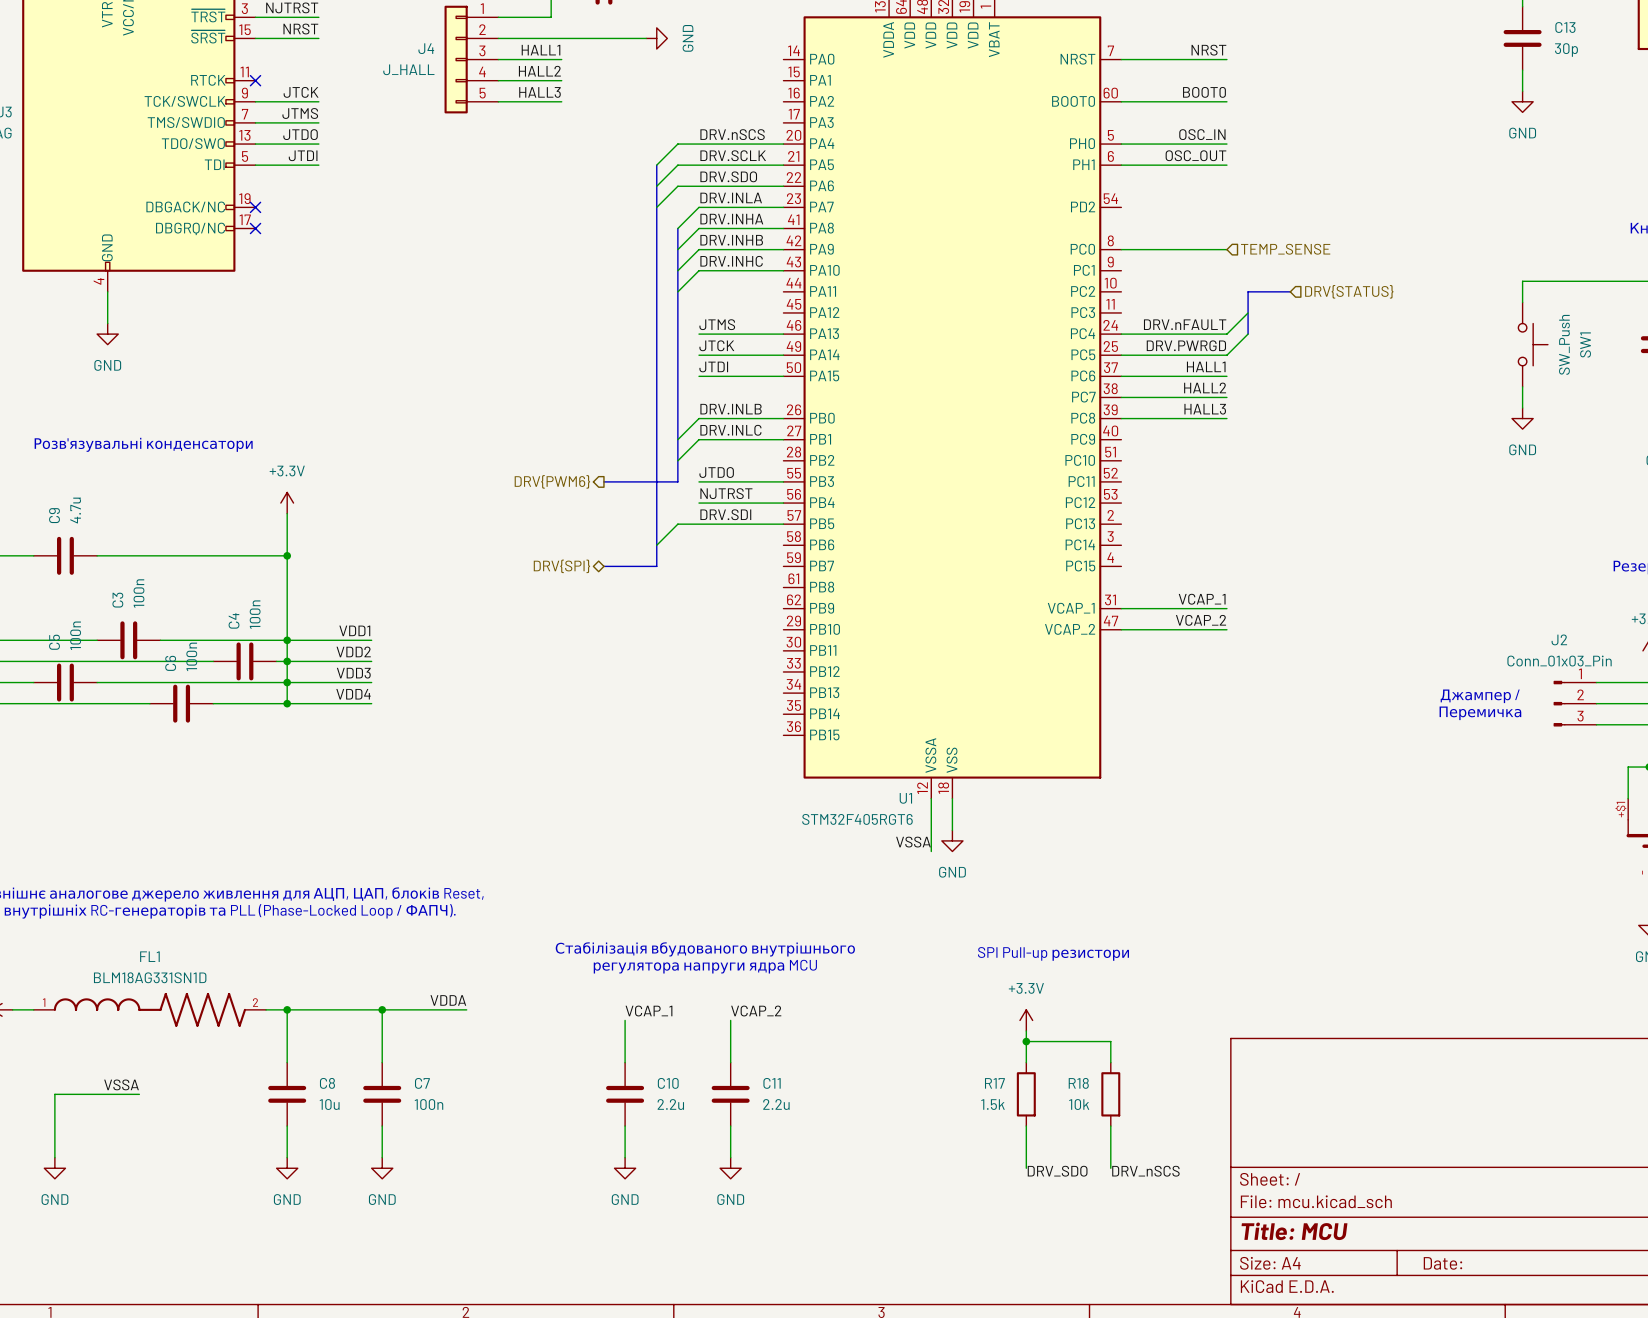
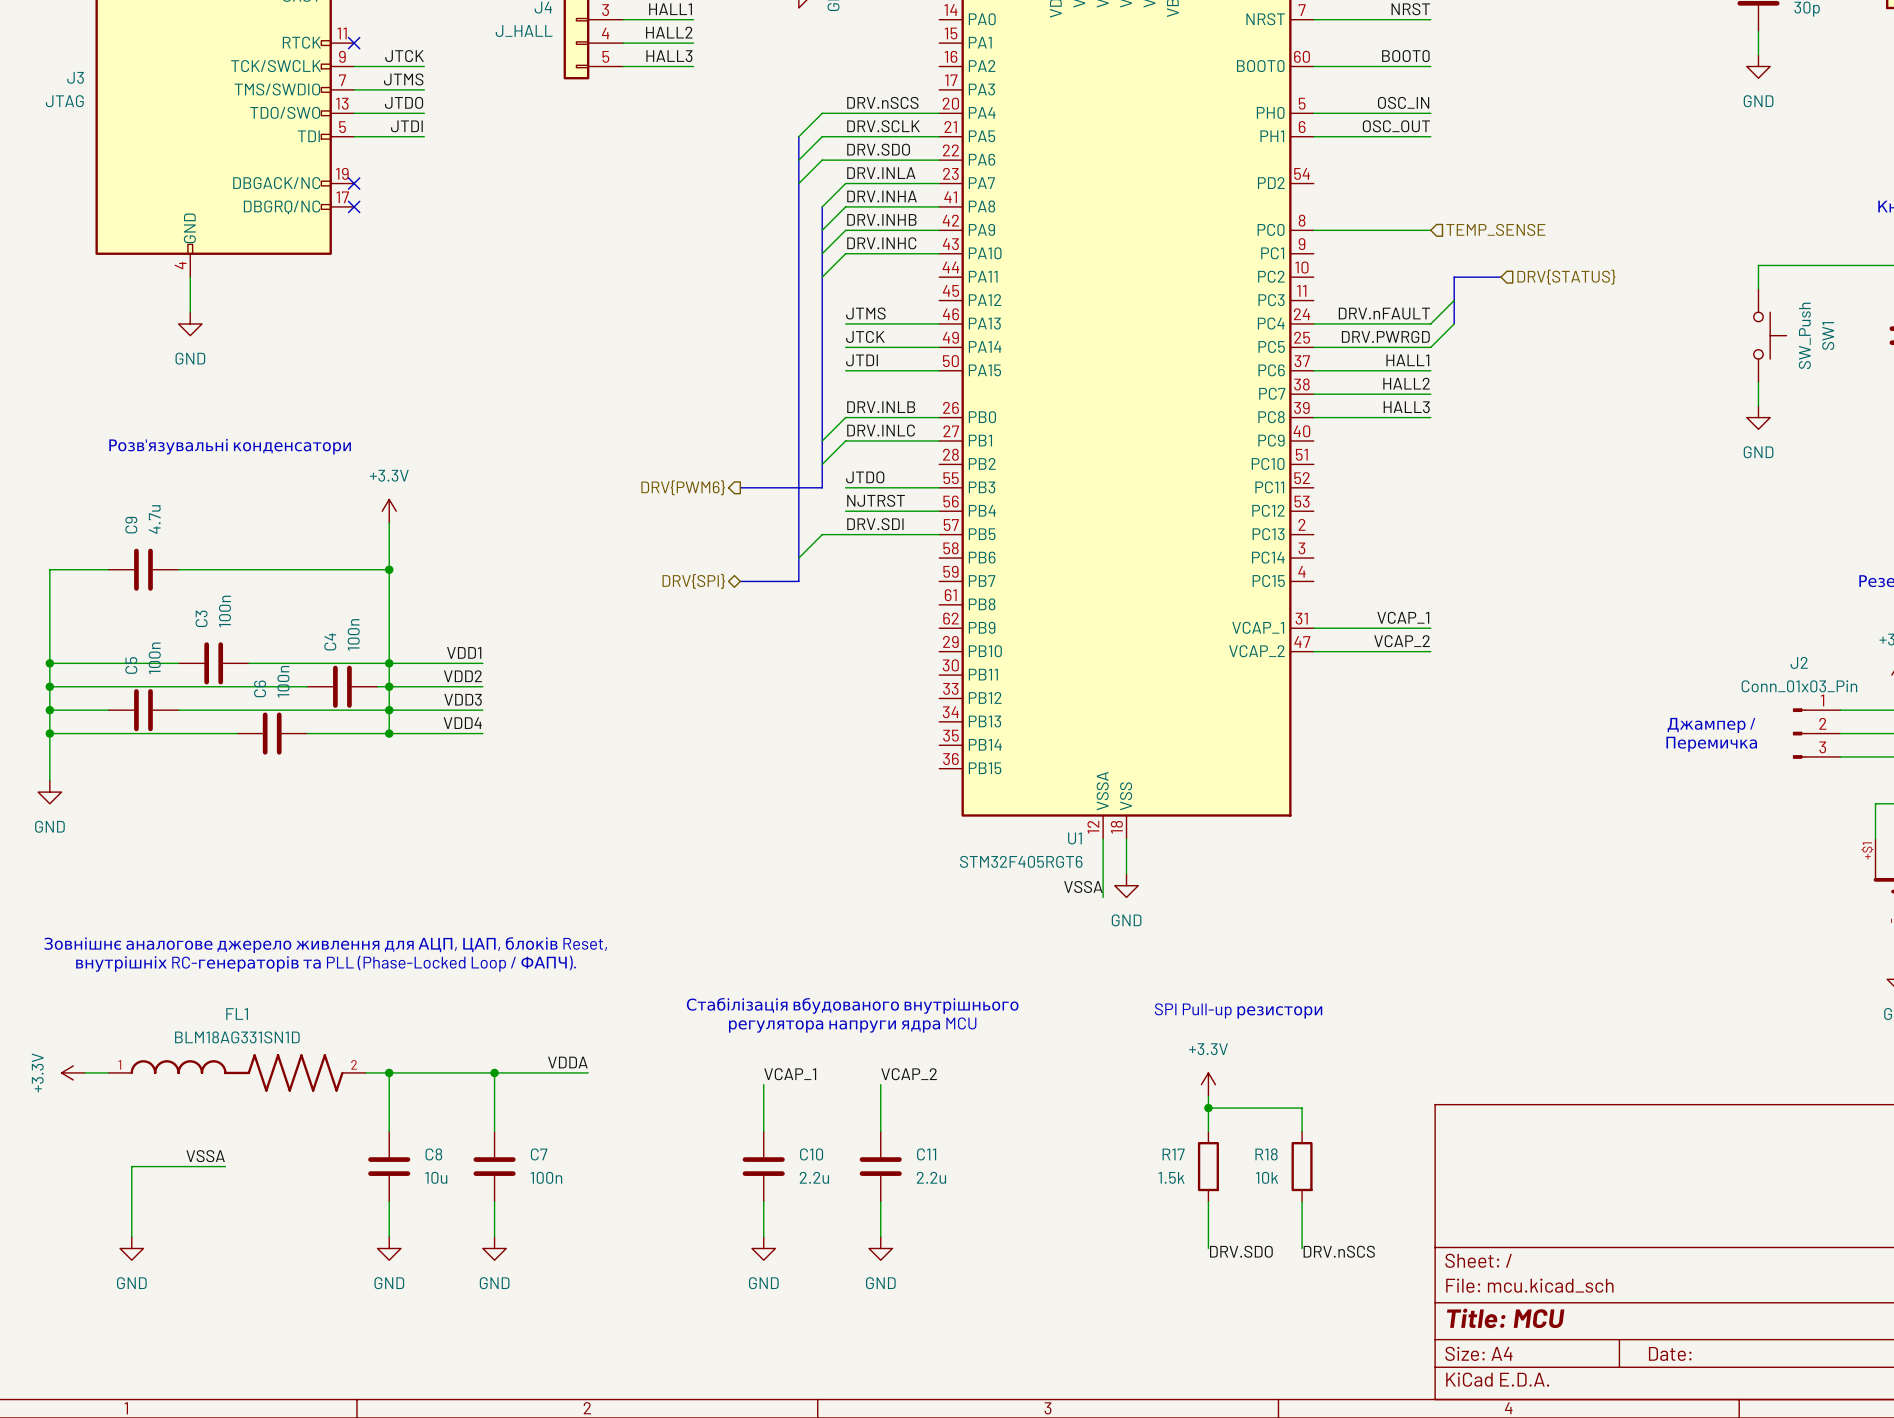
label: DRV_SDO (1057, 1171) -> DRV.SDO (1241, 1251)
label: DRV_nSCS (1145, 1171) -> DRV.nSCS (1339, 1251)

